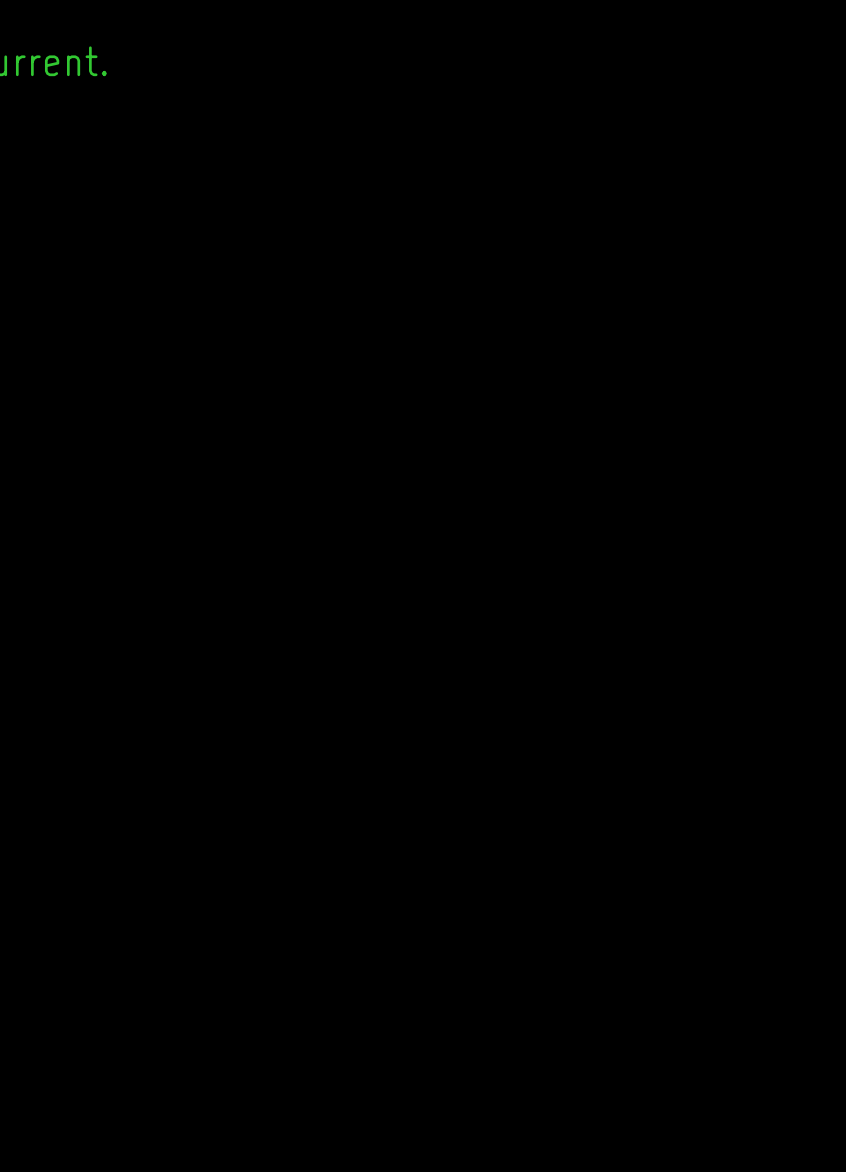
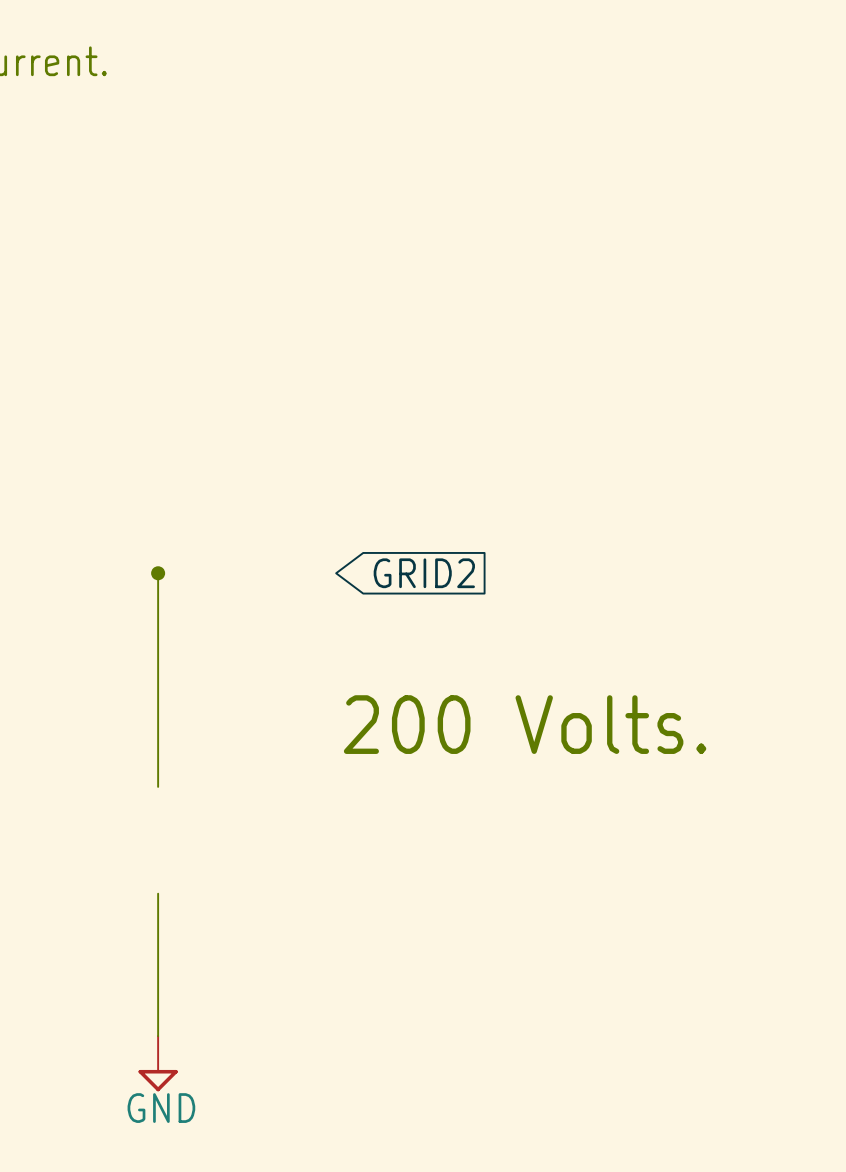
wire: none -> (158, 573) (158, 786)
junction: none -> (158, 573)
global label: none -> GRID2 (424, 573)
text: none -> 200 Volts. (525, 724)
wire: none -> (158, 893) (158, 1036)
power symbol: none -> GND (158, 1063)

